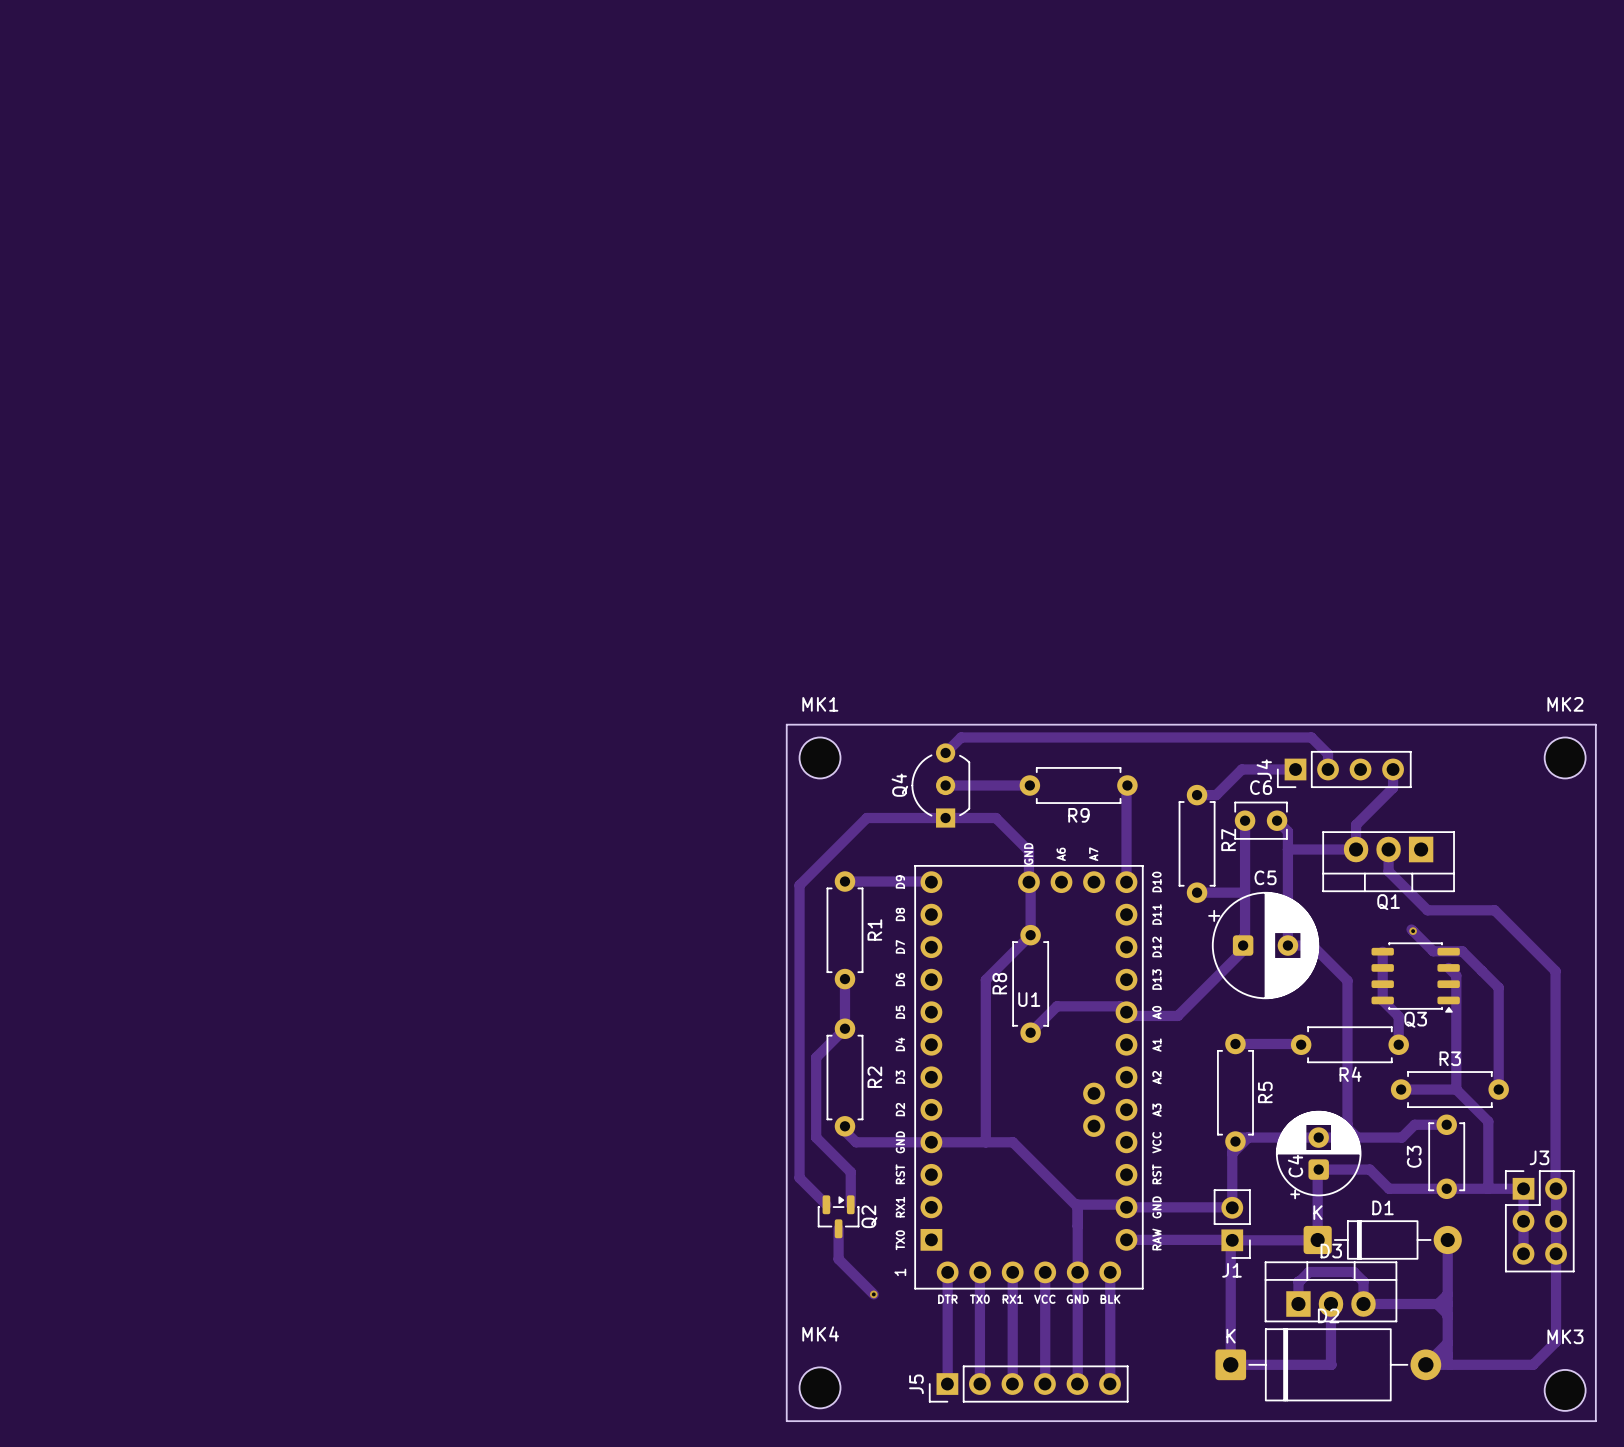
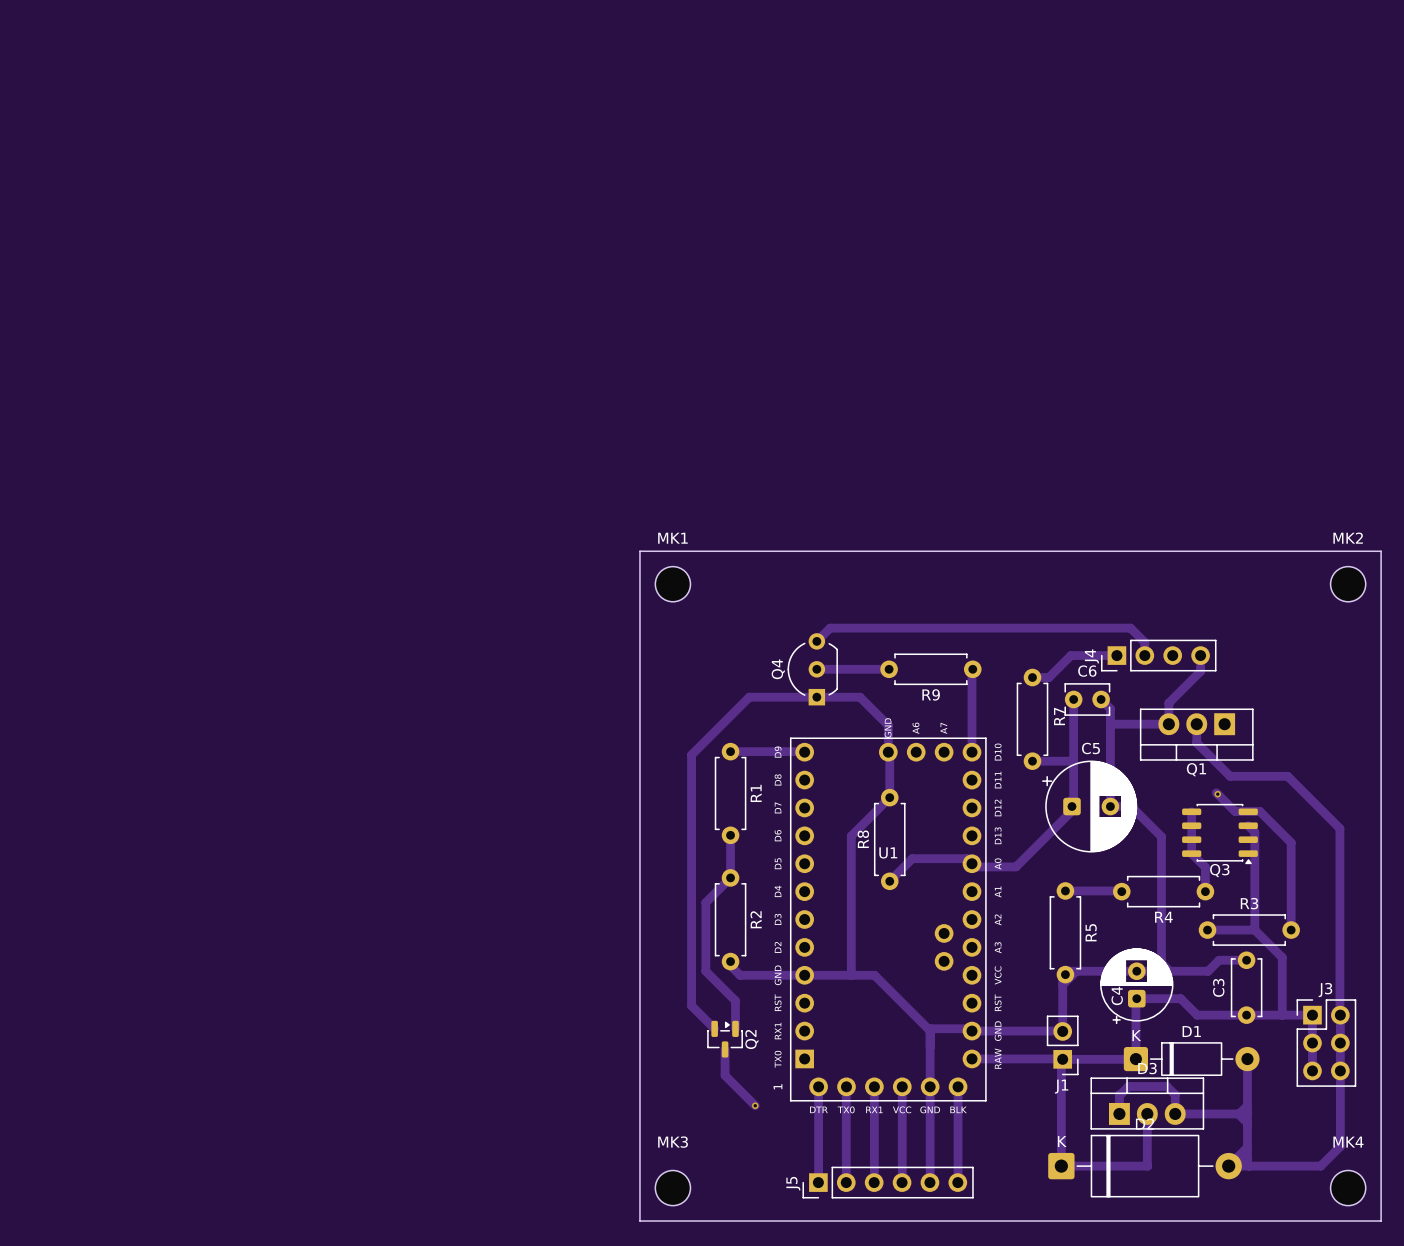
board edge: (786, 724) (1595, 724) (1595, 1421) (786, 1421) (786, 724) -> (639, 551) (639, 1221) (1381, 1221) (1381, 551) (639, 551)
MK1 position: (820, 757) -> (672, 584)
MK2 position: (1565, 757) -> (1348, 584)
MK3 name: MK3 (1565, 1336) -> MK4 (1348, 1142)
MK4: (820, 1387) -> none
MK3: none -> (672, 1188)

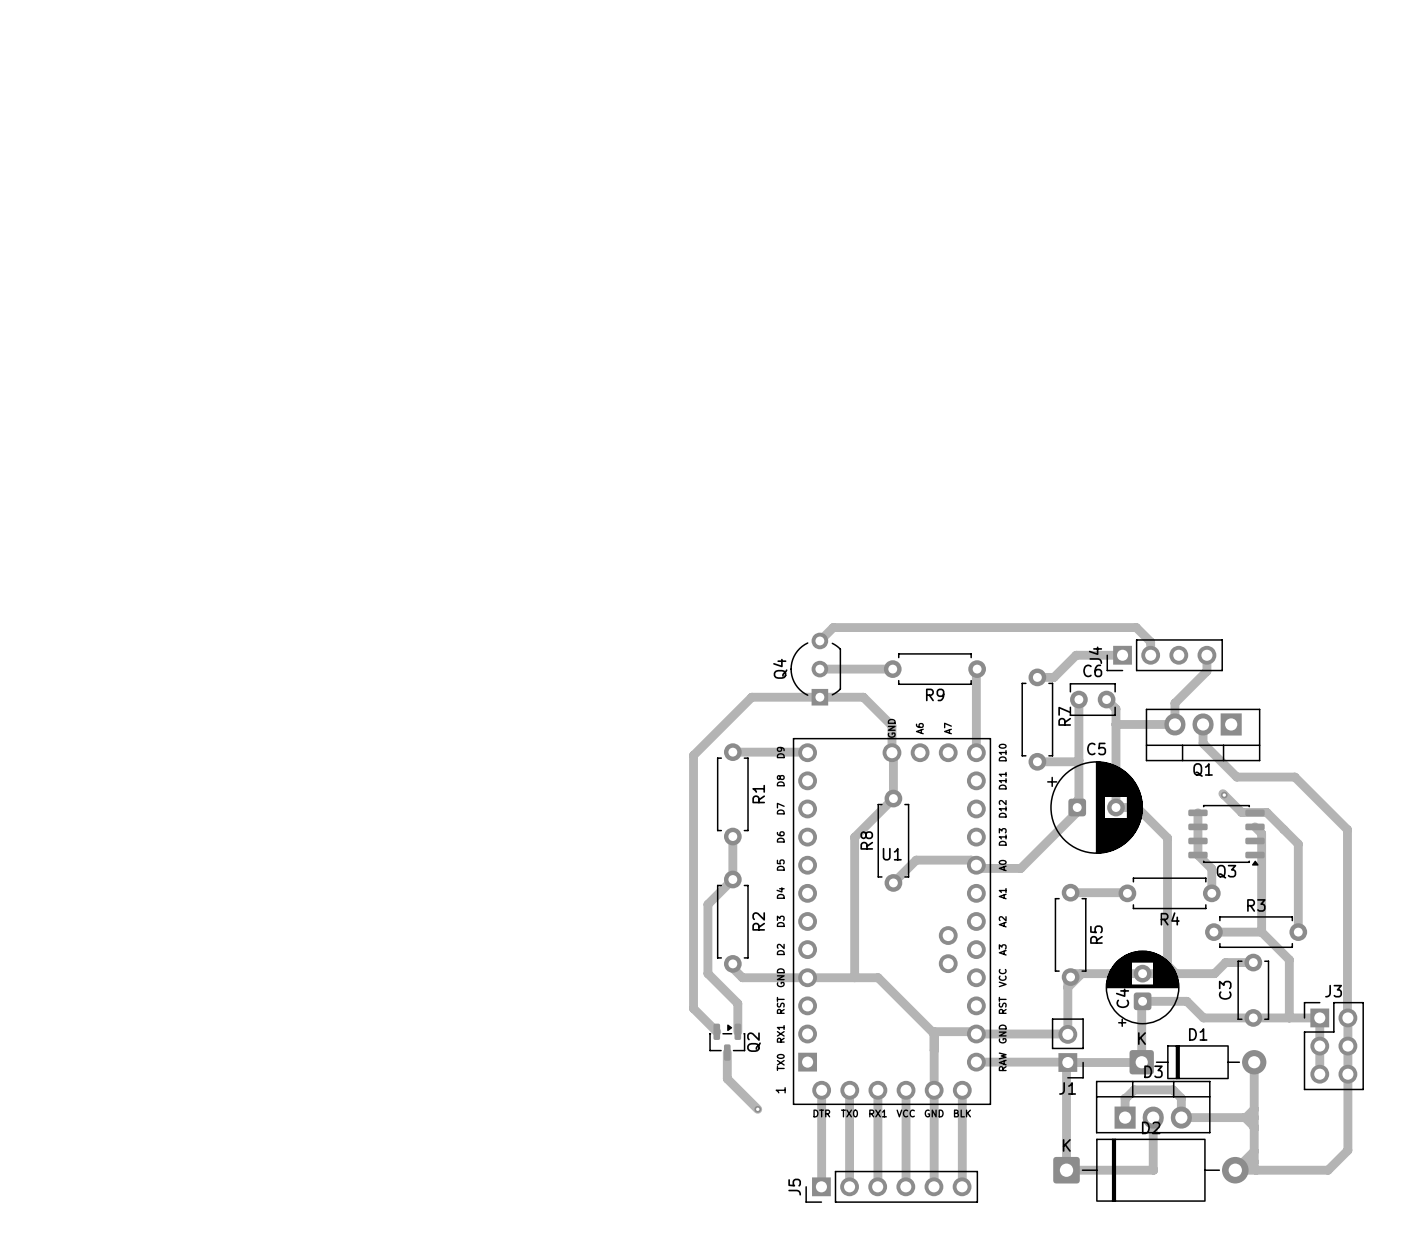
board edge: (639, 551) (1381, 551) (1381, 1221) (639, 1221) (639, 551) -> none
MK1: (672, 584) -> none
MK2: (1348, 584) -> none
MK3: (672, 1188) -> none
MK4: (1348, 1188) -> none

